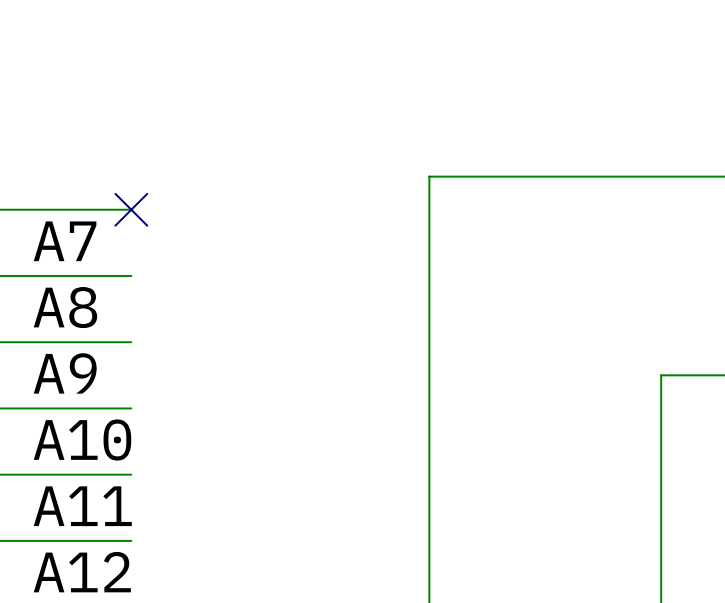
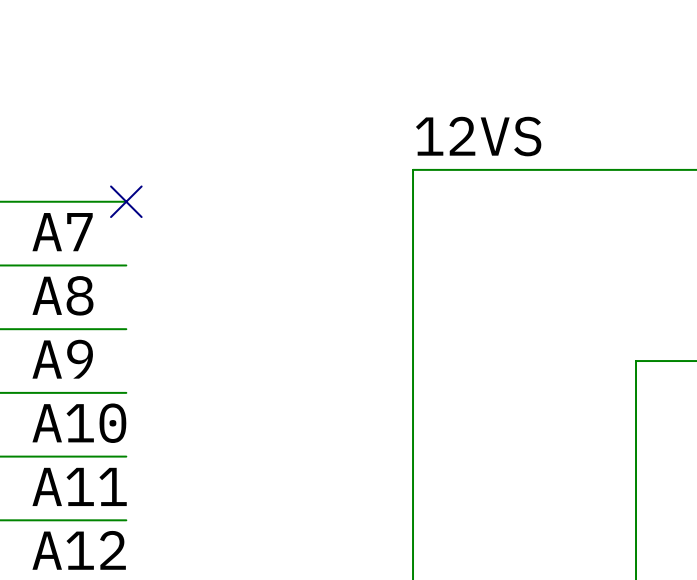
label: none -> 12VS (478, 136)

